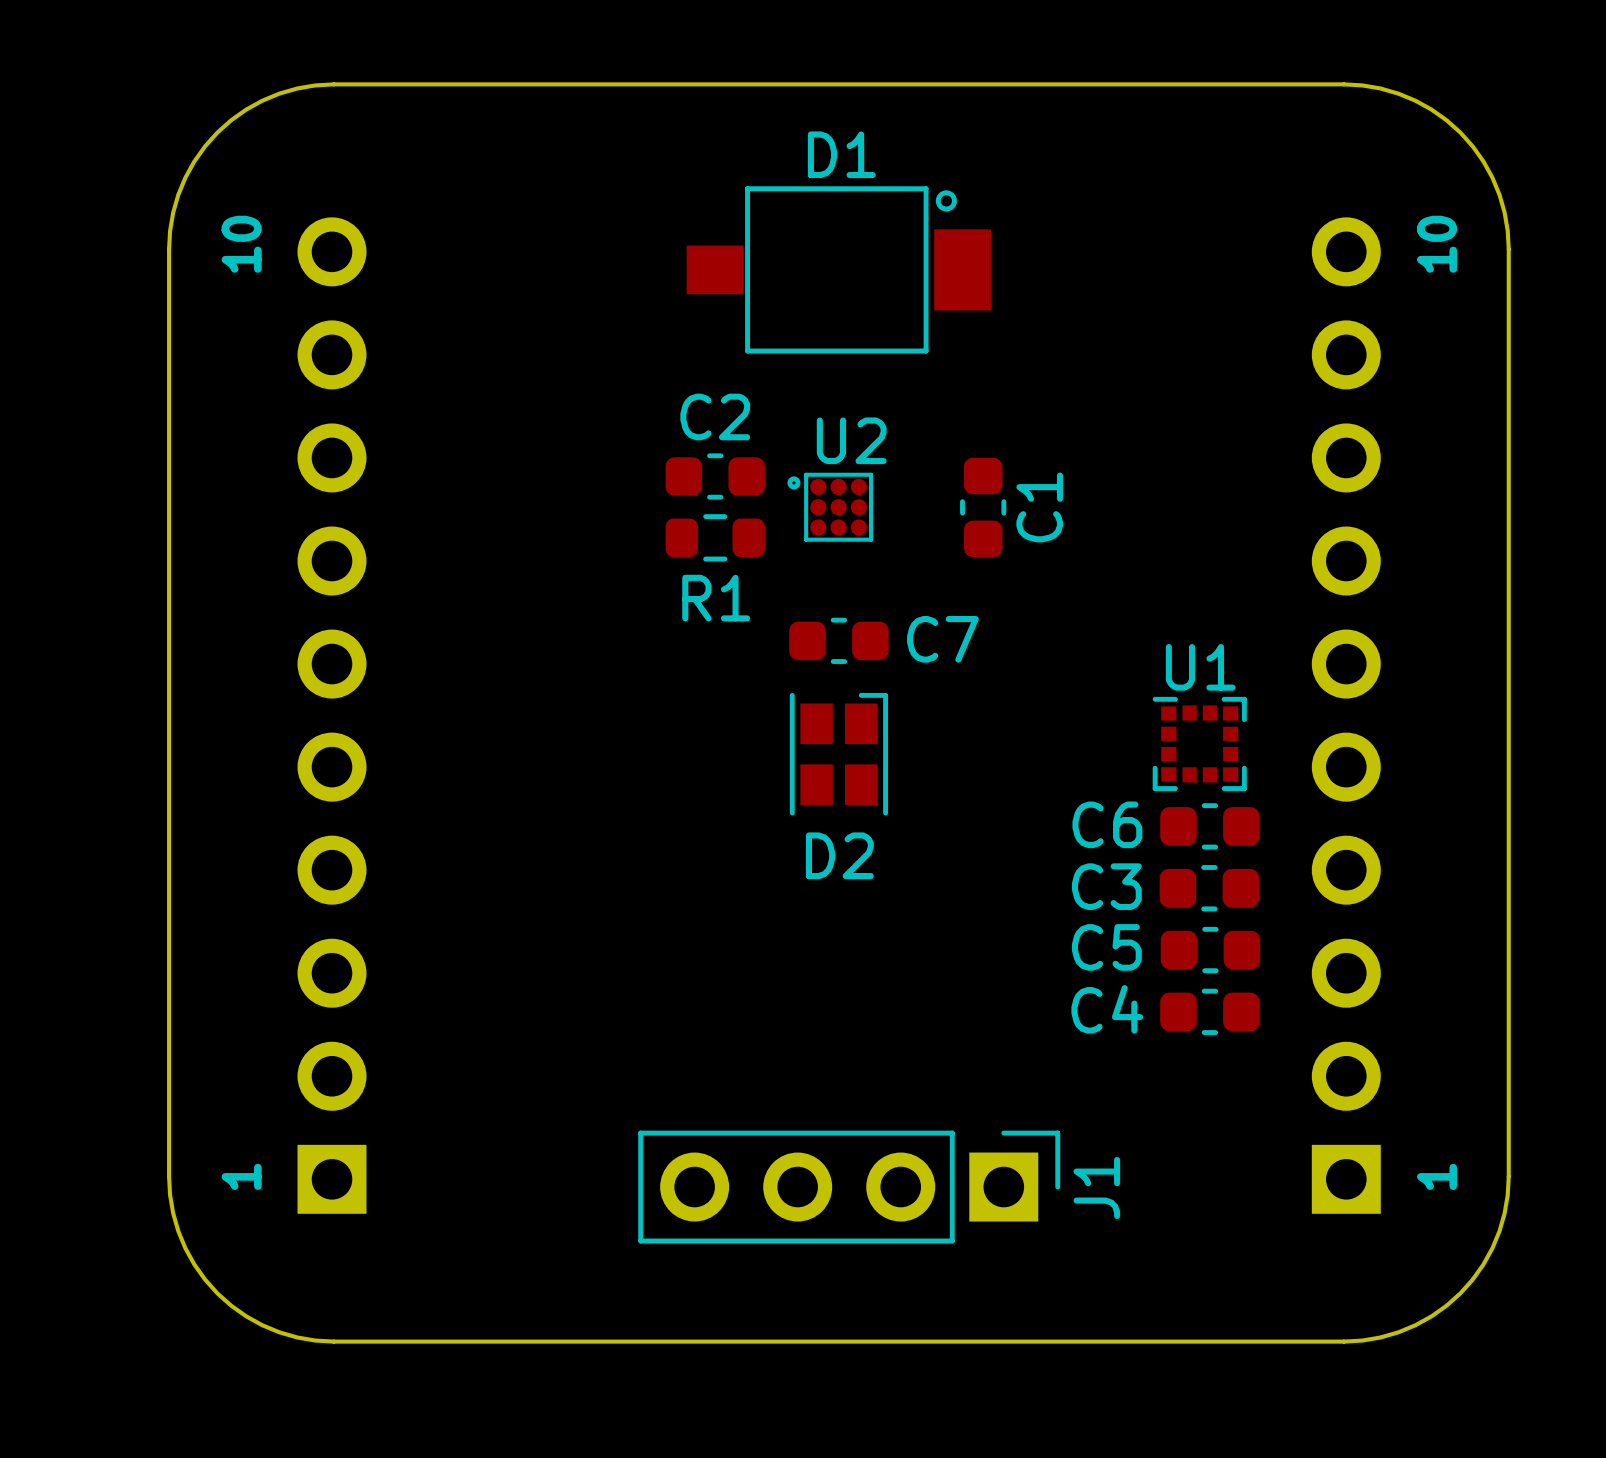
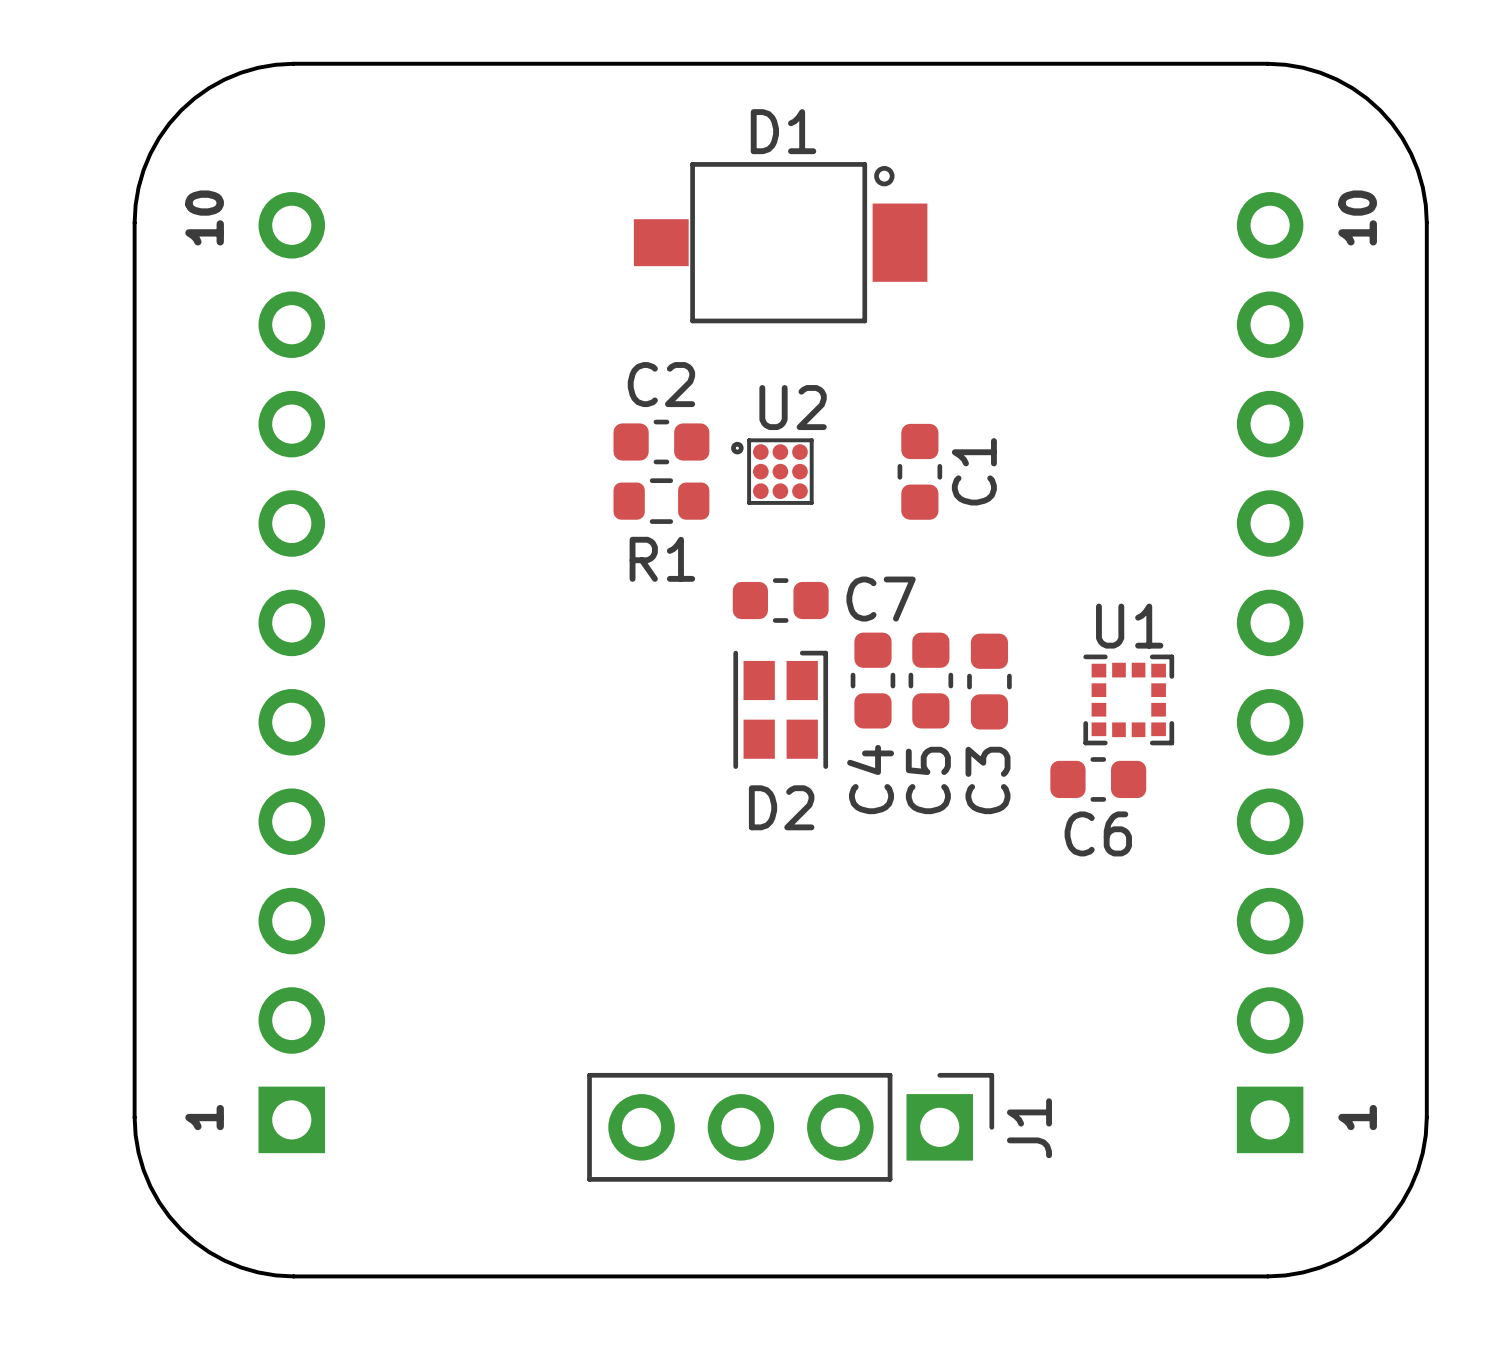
C6 name position: C6 (1107, 824) -> C6 (1098, 833)
C6 position: (1209, 826) -> (1098, 779)
C3 name position: C3 (1106, 886) -> C3 (987, 780)
C3 rotation: 0° (1209, 888) -> 90° clockwise (989, 681)
C3 position: (1209, 888) -> (989, 681)
C5 name position: C5 (1106, 947) -> C5 (928, 780)
C5 rotation: 0° (1210, 949) -> 90° clockwise (930, 680)
C5 position: (1210, 949) -> (930, 680)
C4 name position: C4 (1107, 1009) -> C4 (870, 779)
C4 rotation: 0° (1209, 1011) -> 90° clockwise (872, 680)
C4 position: (1209, 1011) -> (872, 680)

